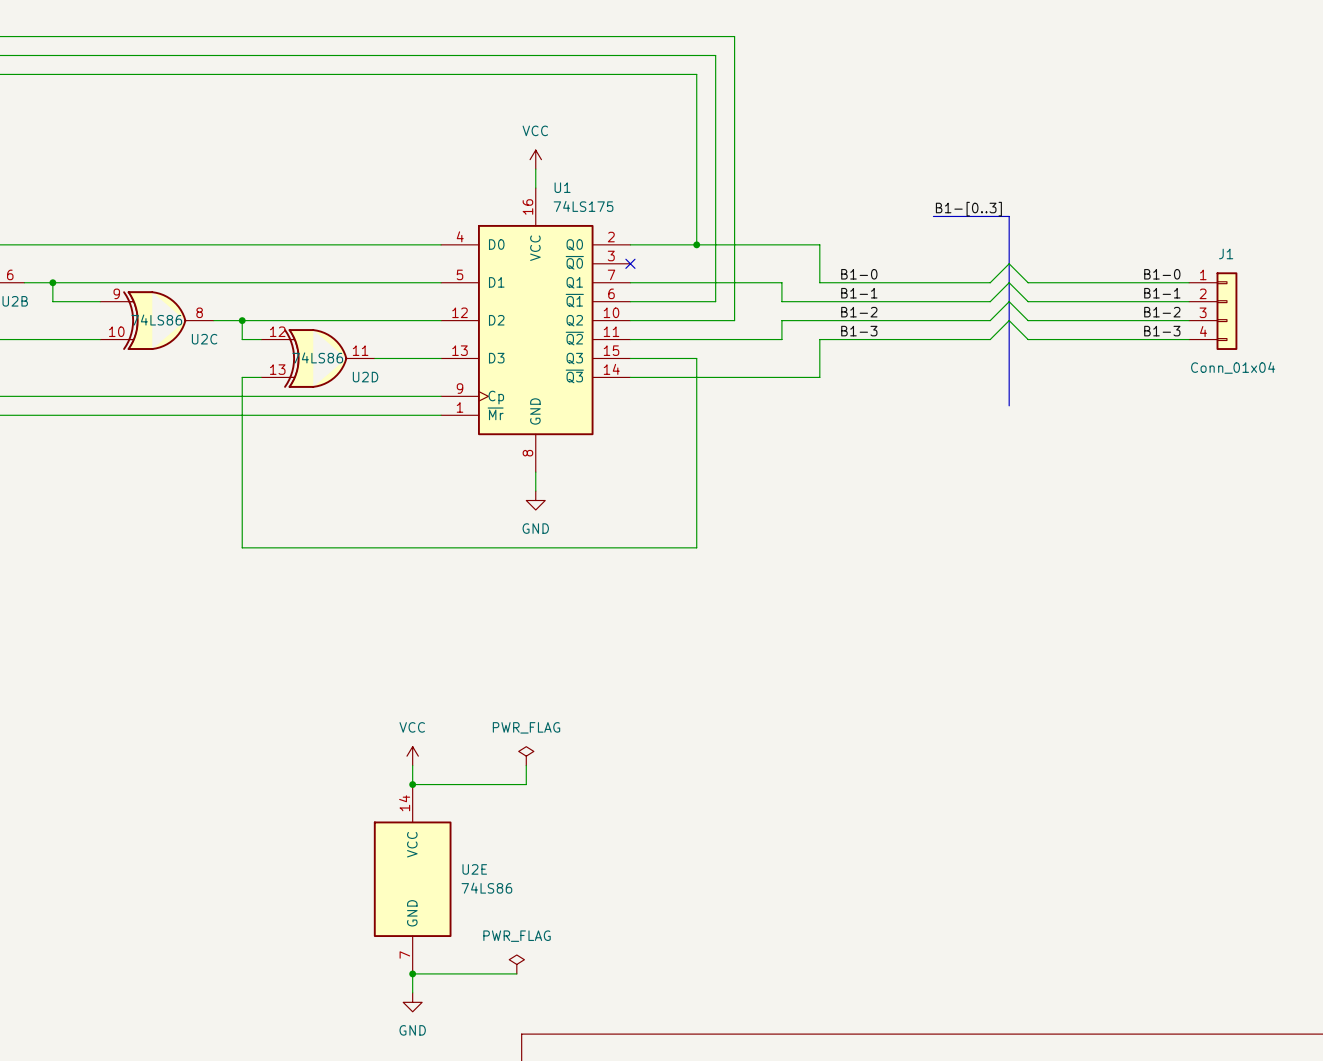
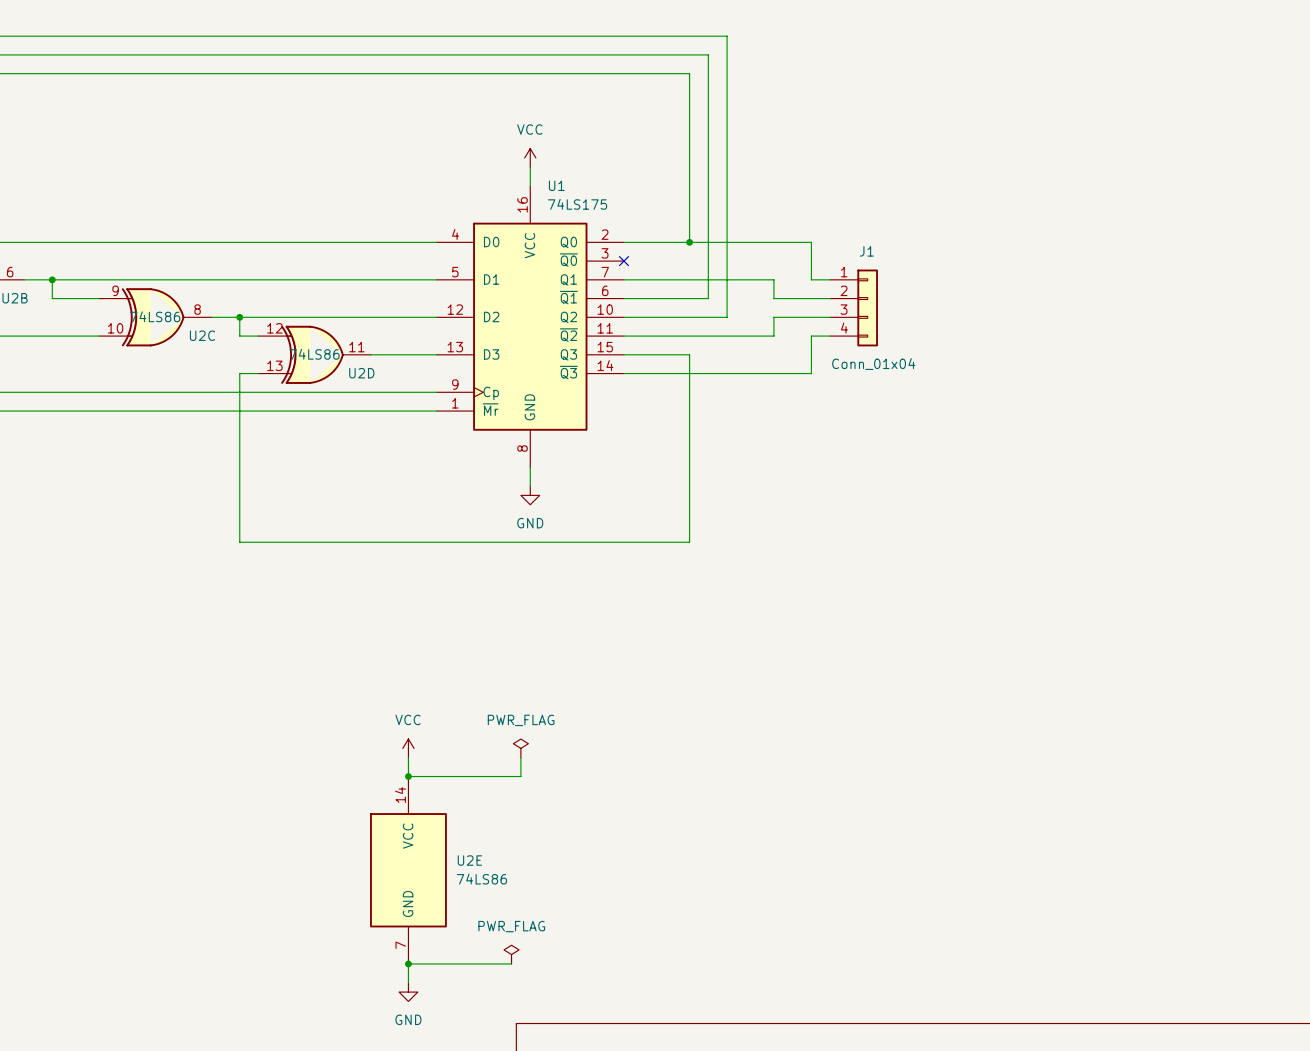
label: B1-[0..3] (968, 209) -> none
bus: (933, 216) (1009, 216) (1009, 405) -> none
label: B1-0 (859, 274) -> none
label: B1-0 (1162, 274) -> none
wire: (838, 282) (990, 282) (1009, 263) (1028, 282) (1189, 282) -> none
label: B1-1 (859, 293) -> none
label: B1-1 (1162, 293) -> none
wire: (838, 301) (990, 301) (1009, 282) (1028, 301) (1189, 301) -> none
J1 position: (1213, 311) -> (854, 307)
label: B1-2 (859, 312) -> none
label: B1-2 (1162, 312) -> none
wire: (838, 320) (990, 320) (1009, 301) (1028, 320) (1189, 320) -> none
label: B1-3 (859, 331) -> none
label: B1-3 (1162, 331) -> none
wire: (838, 339) (990, 339) (1009, 320) (1028, 339) (1189, 339) -> none

